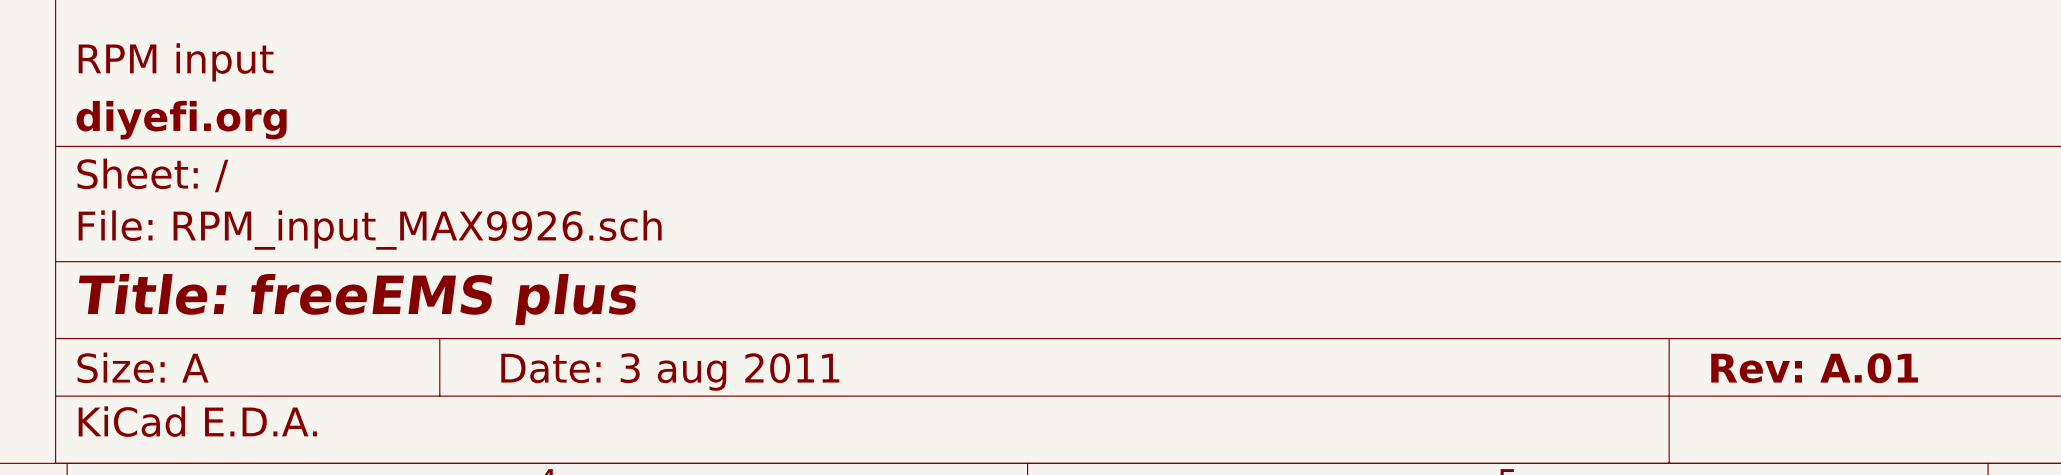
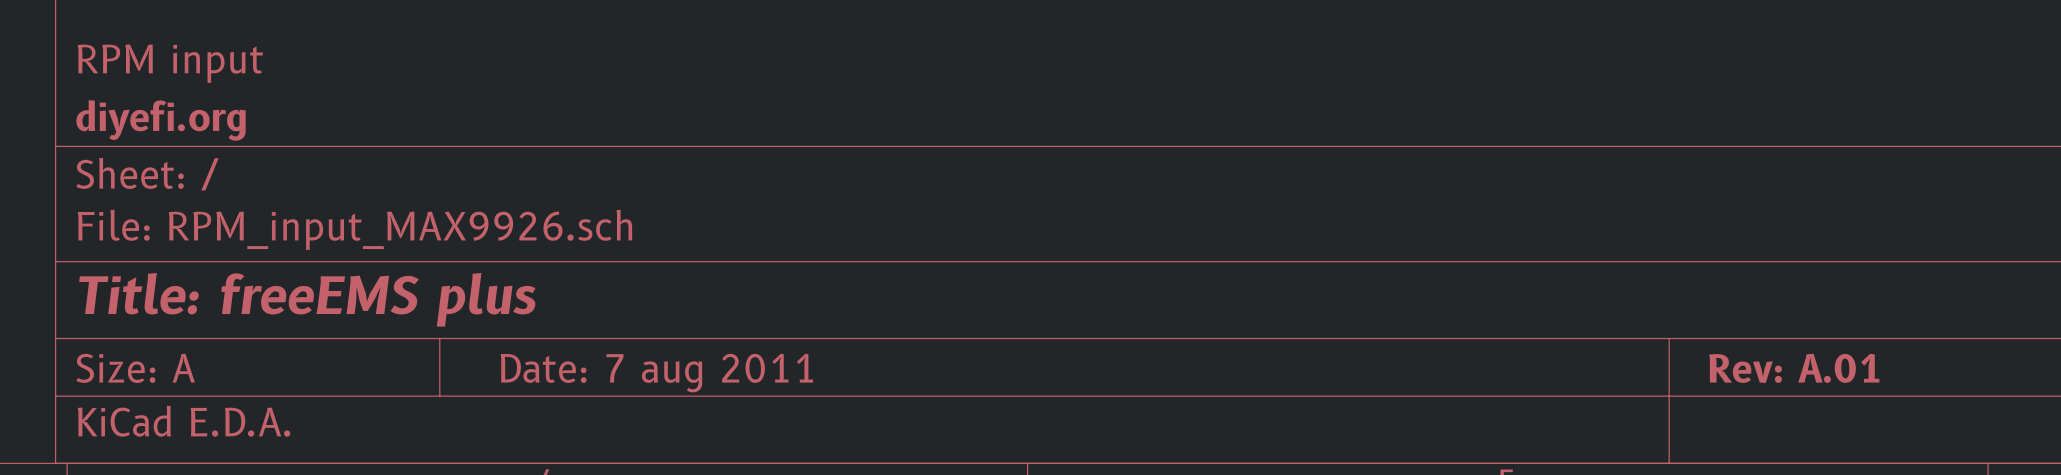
title block: Date: 3 aug 2011 (670, 372) -> Date: 7 aug 2011 (656, 373)

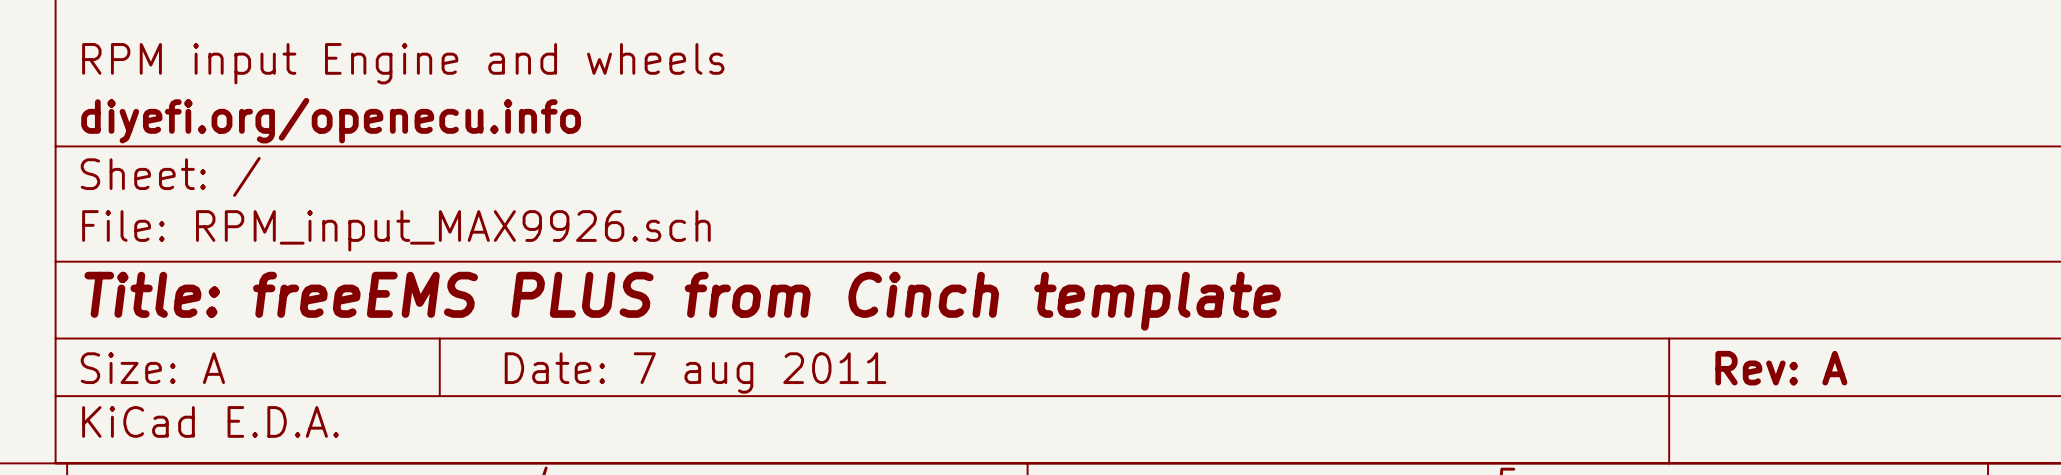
title block: RPM input (170, 63) -> RPM input Engine and wheels (403, 63)
title block: diyefi.org (160, 120) -> diyefi.org/openecu.info (331, 120)
title block: Title: freeEMS plus (307, 299) -> Title: freeEMS PLUS from Cinch template (682, 301)
title block: Rev: A.01 (1794, 368) -> Rev: A (1781, 368)

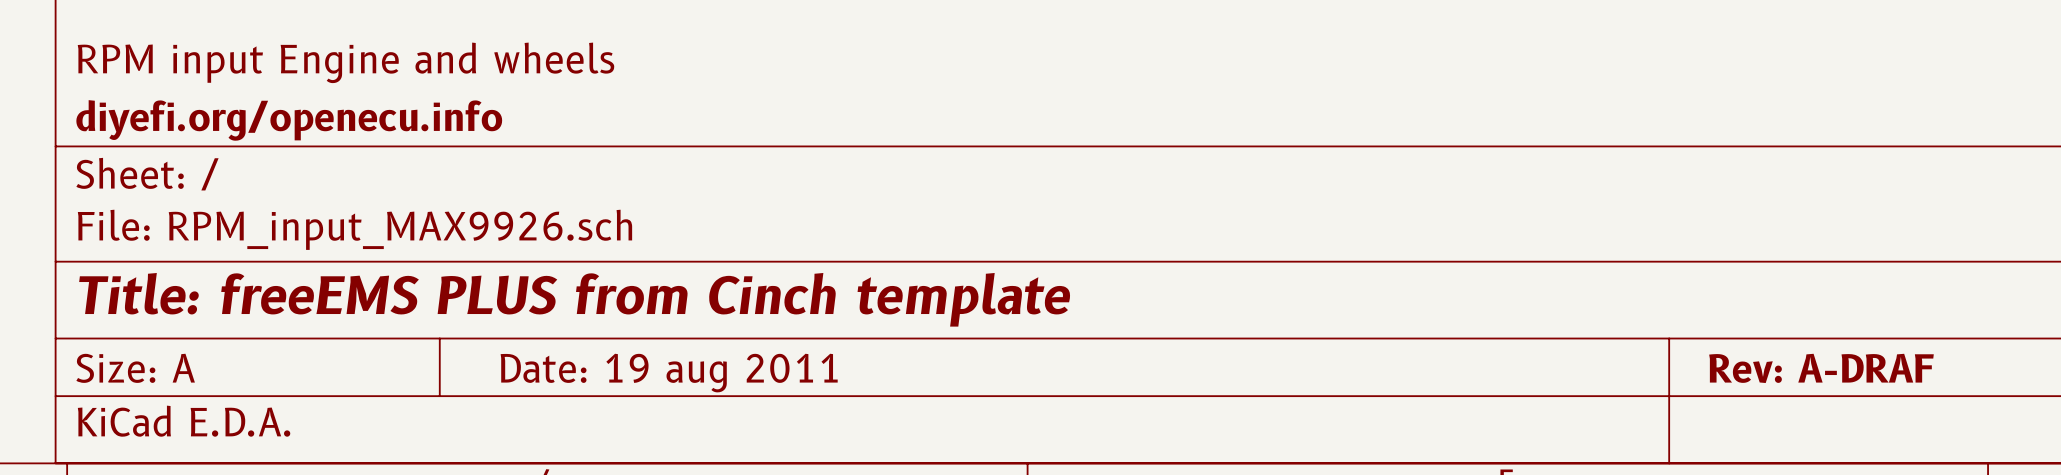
title block: Rev: A (1781, 368) -> Rev: A-DRAF (1821, 368)
title block: Date: 7 aug 2011 (695, 372) -> Date: 19 aug 2011 (669, 373)

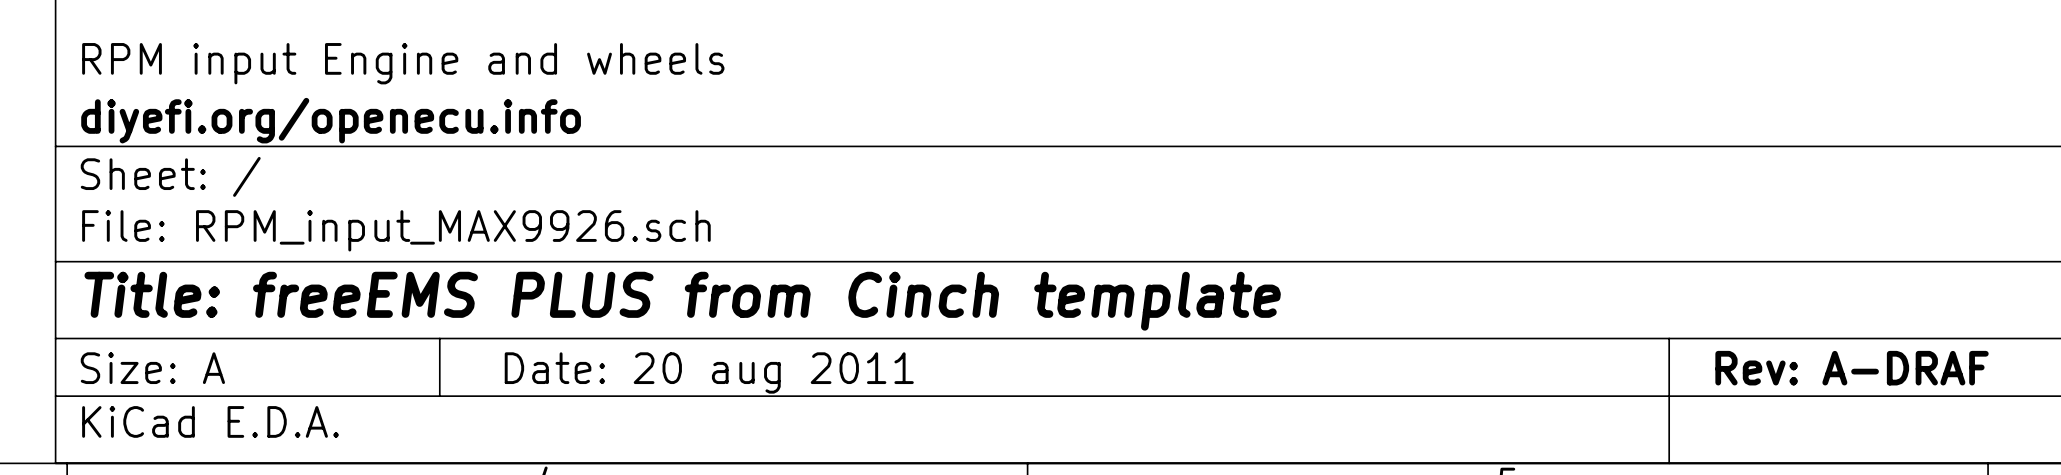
title block: Date: 19 aug 2011 (669, 373) -> Date: 20 aug 2011 (709, 372)

